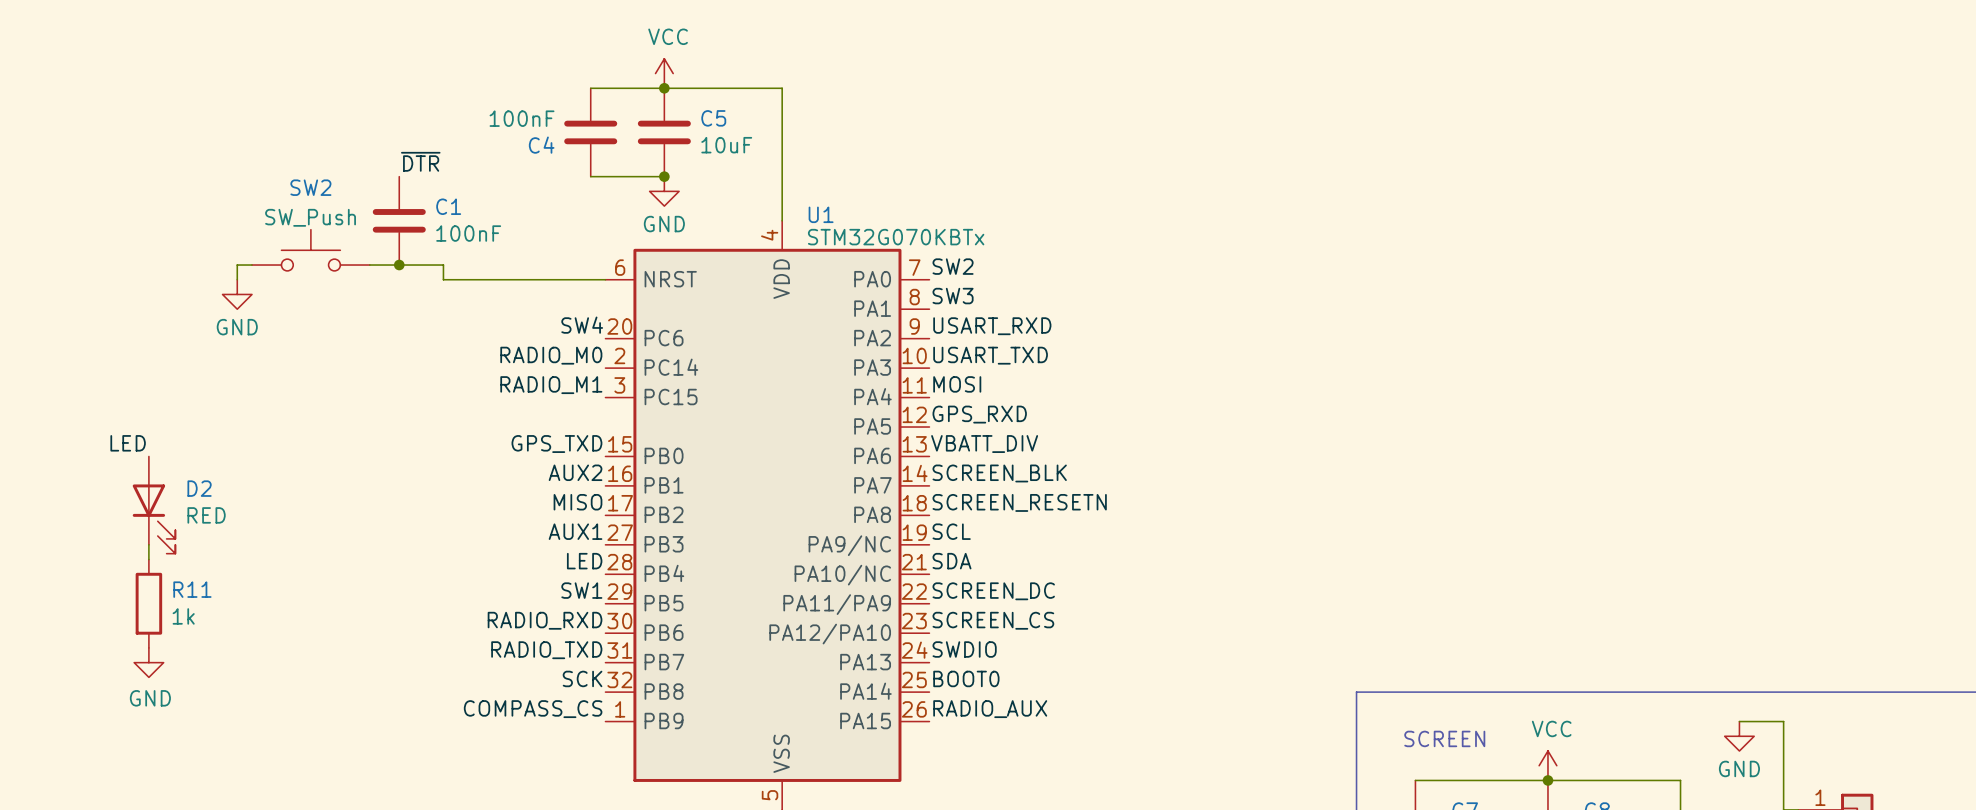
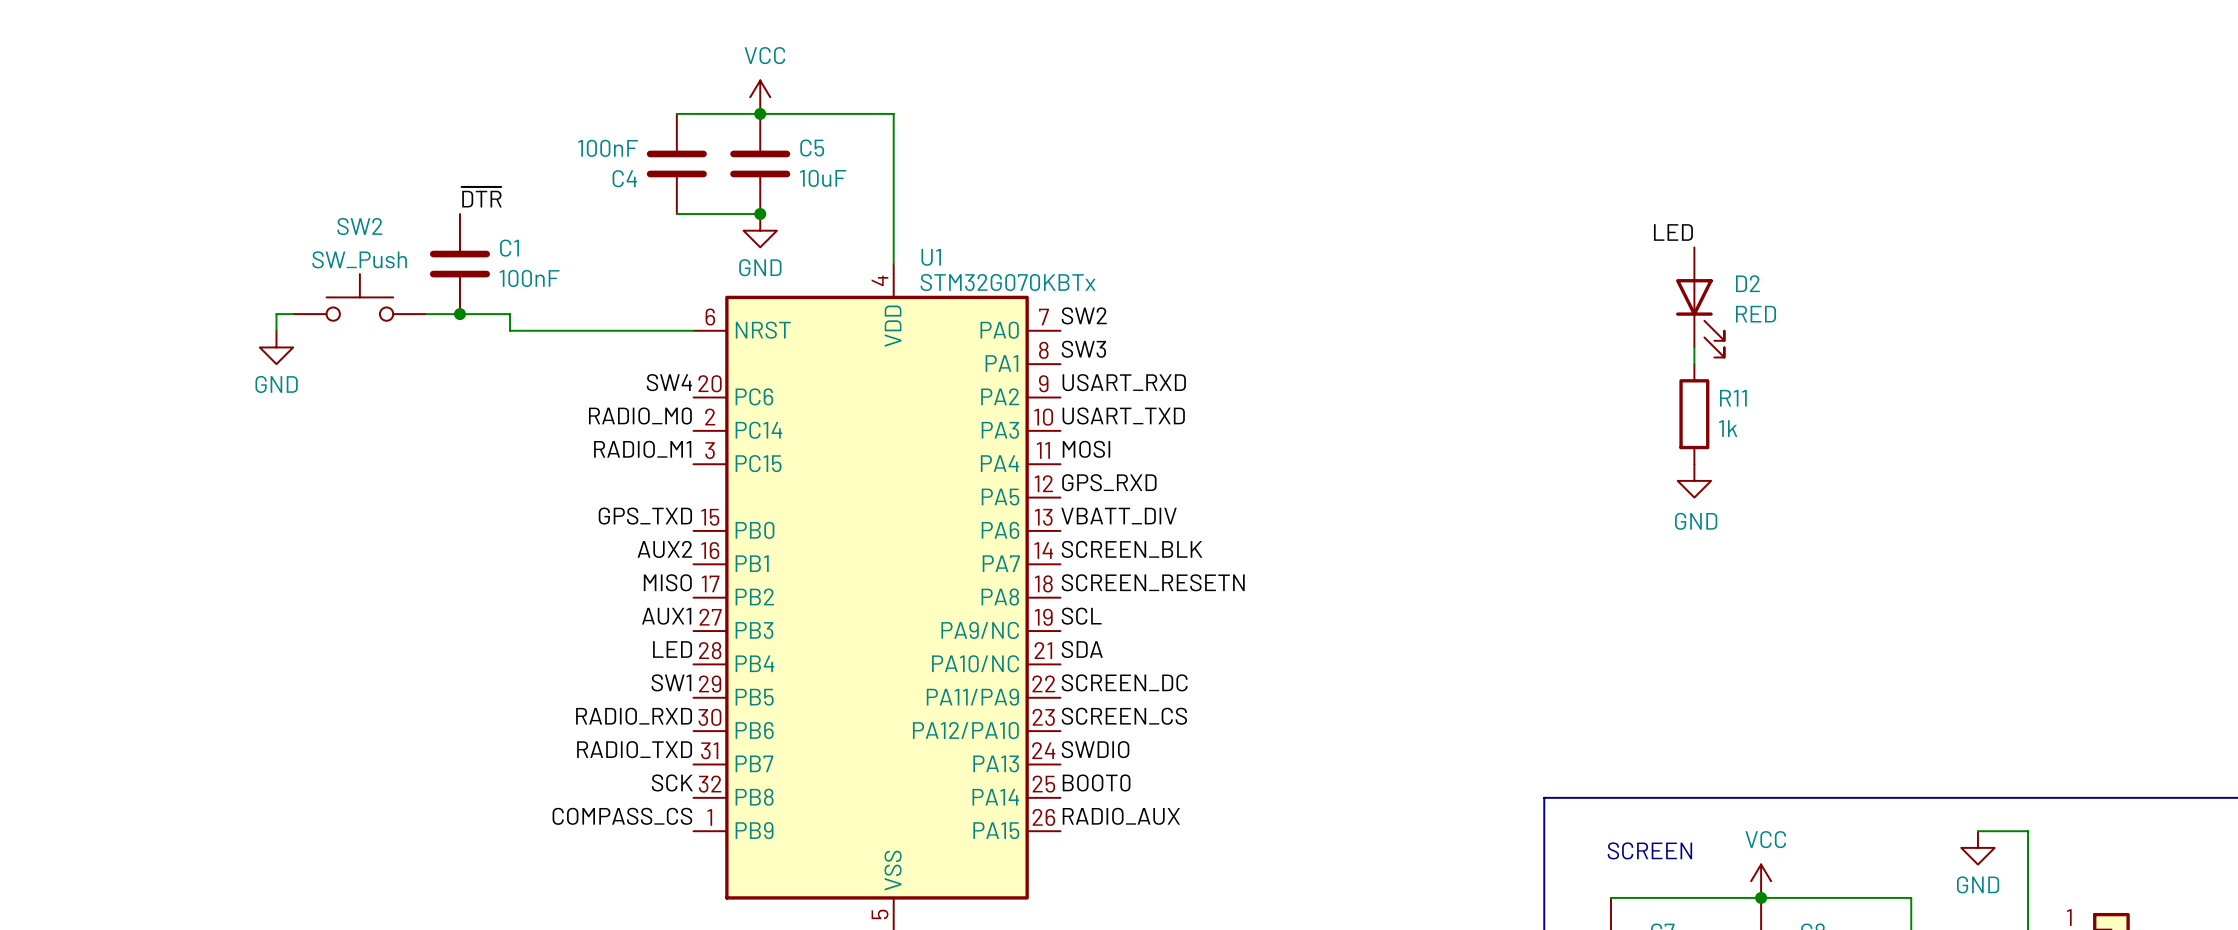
label: none -> LED (1673, 232)
wire: none -> (1694, 347) (1694, 364)
power symbol: none -> GND (1694, 480)
label: LED (128, 443) -> none
D2 position: (154, 505) -> (1700, 302)
wire: (148, 544) (148, 559) -> none
R11 position: (148, 603) -> (1694, 414)
power symbol: GND (148, 662) -> none

